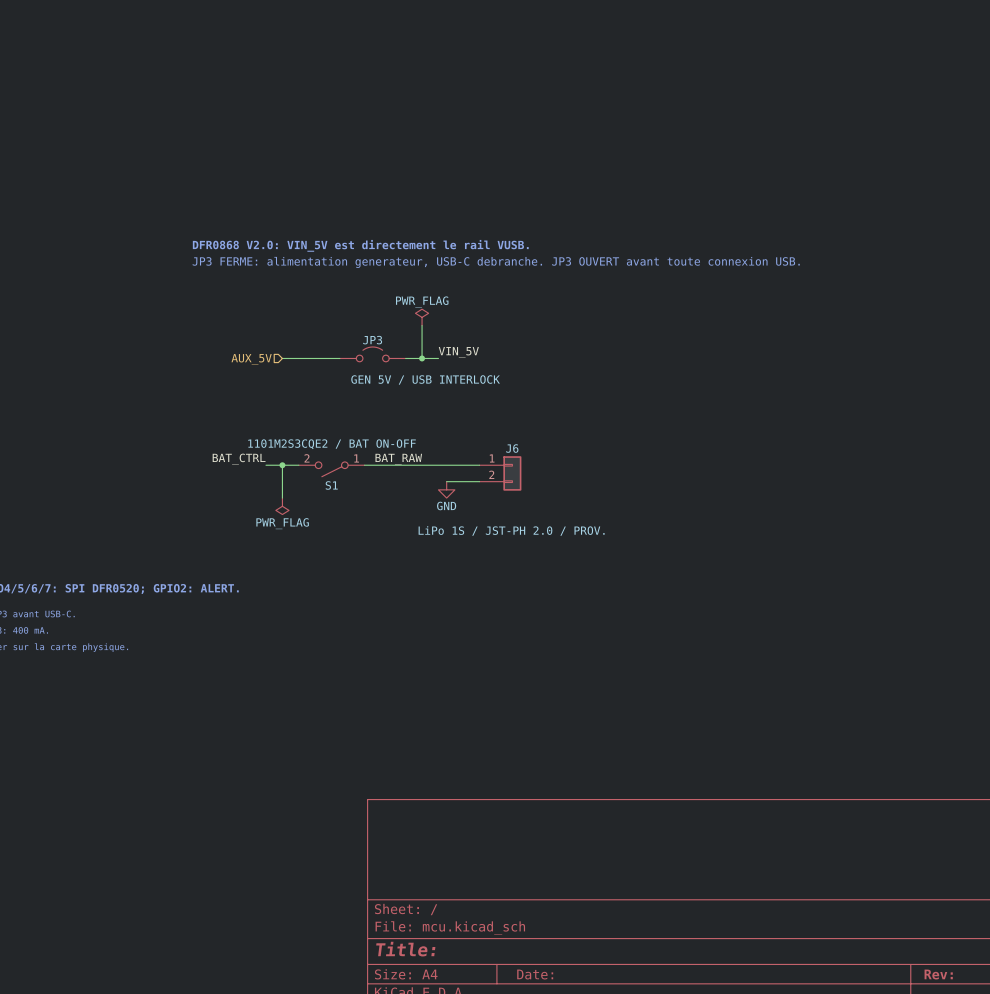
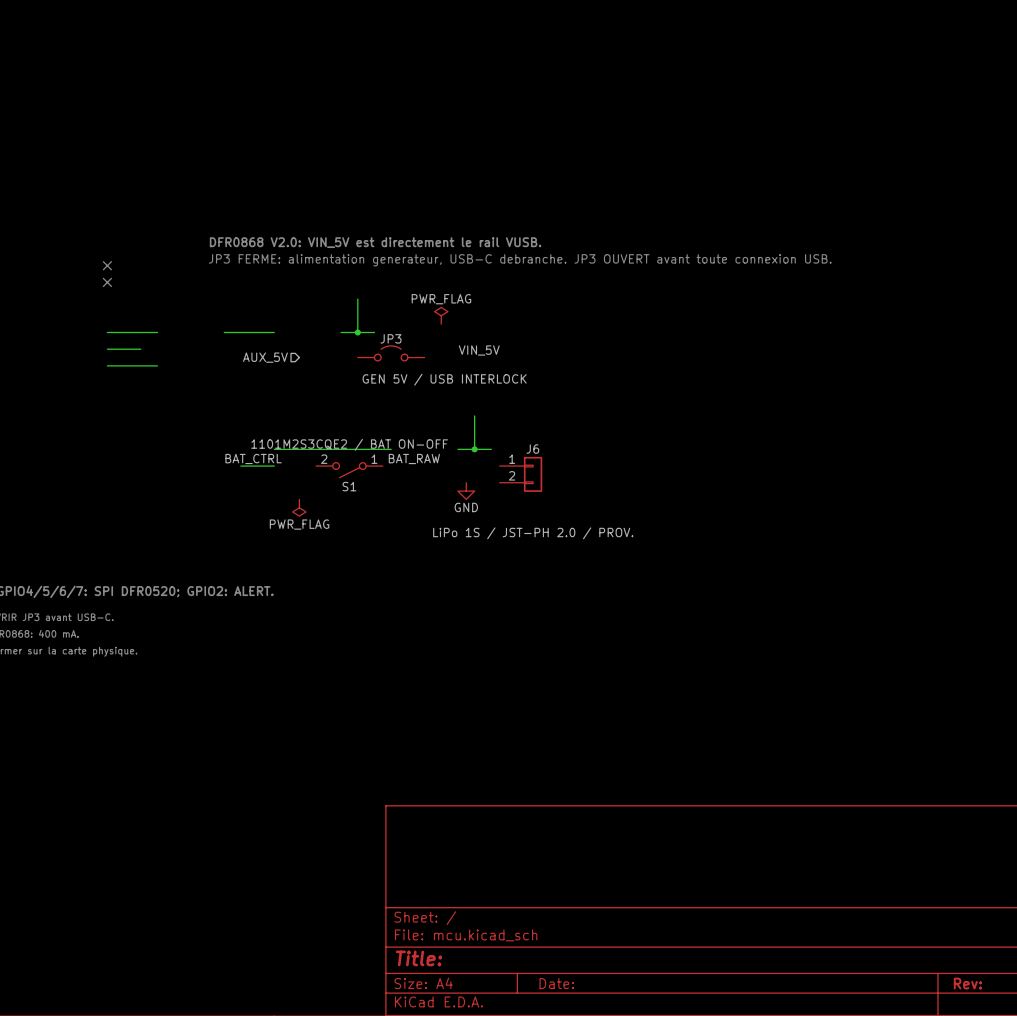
no-connect mark: none -> (107, 265)
no-connect mark: none -> (107, 282)
wire: (422, 325) (422, 358) -> (357, 299) (357, 332)
wire: none -> (107, 332) (157, 332)
wire: none -> (224, 332) (274, 332)
junction: none -> (357, 332)
wire: none -> (107, 349) (140, 349)
wire: (282, 358) (339, 358) -> none
wire: (405, 358) (438, 358) -> (341, 332) (374, 332)
junction: (422, 358) -> none
wire: none -> (107, 365) (157, 365)
wire: none -> (474, 415) (474, 449)
junction: none -> (474, 449)
wire: (266, 465) (298, 465) -> (240, 466) (274, 466)
wire: (282, 465) (282, 498) -> none
junction: (282, 465) -> none
wire: (364, 465) (479, 465) -> (274, 449) (391, 449)
wire: (446, 481) (479, 481) -> (457, 449) (491, 449)

